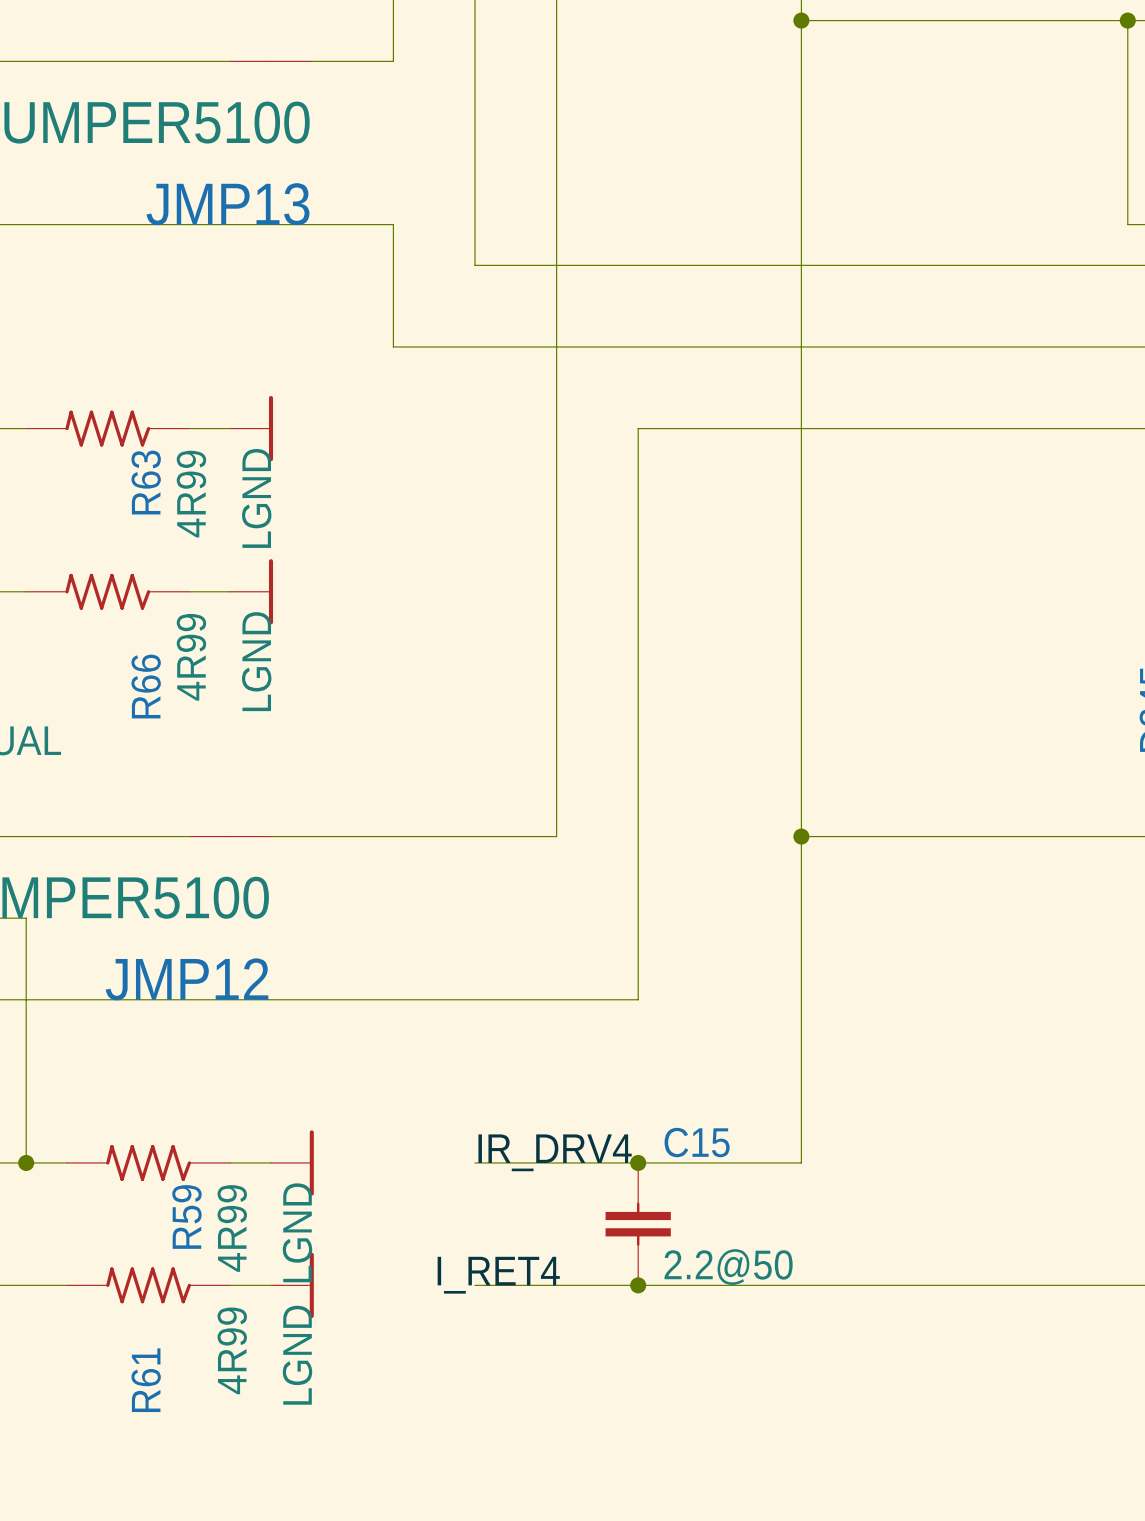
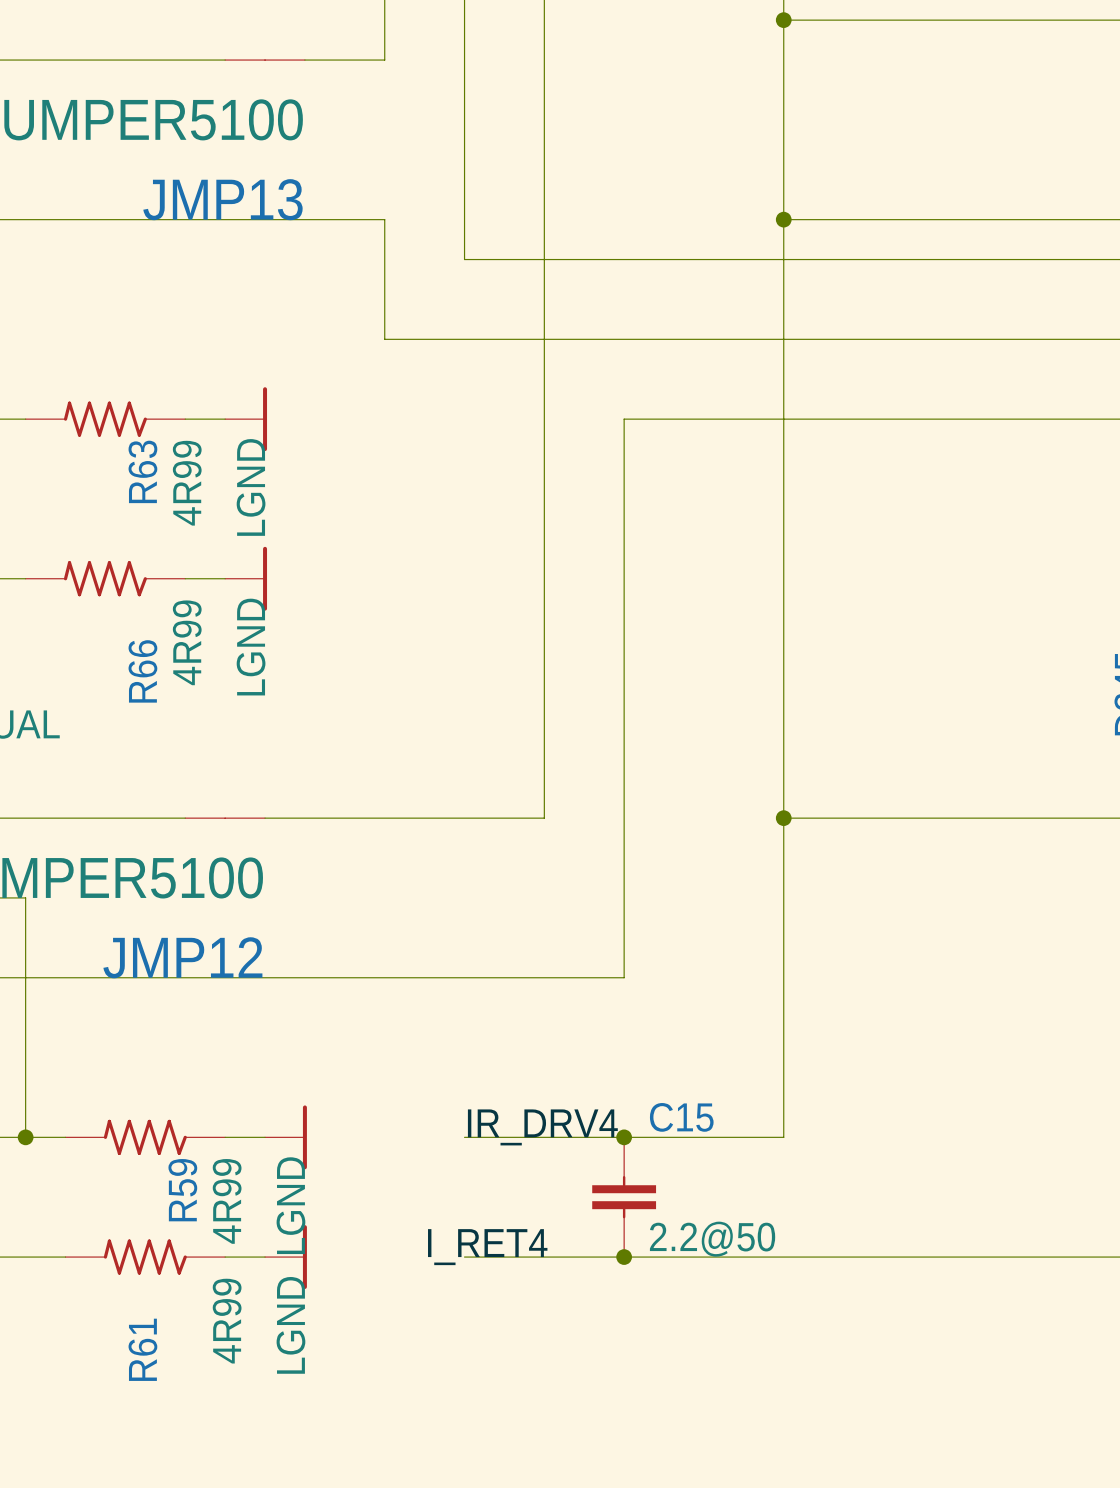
wire: (1127, 20) (1127, 224) -> (783, 219) (1102, 219)
junction: (1127, 20) -> none
junction: none -> (783, 219)

